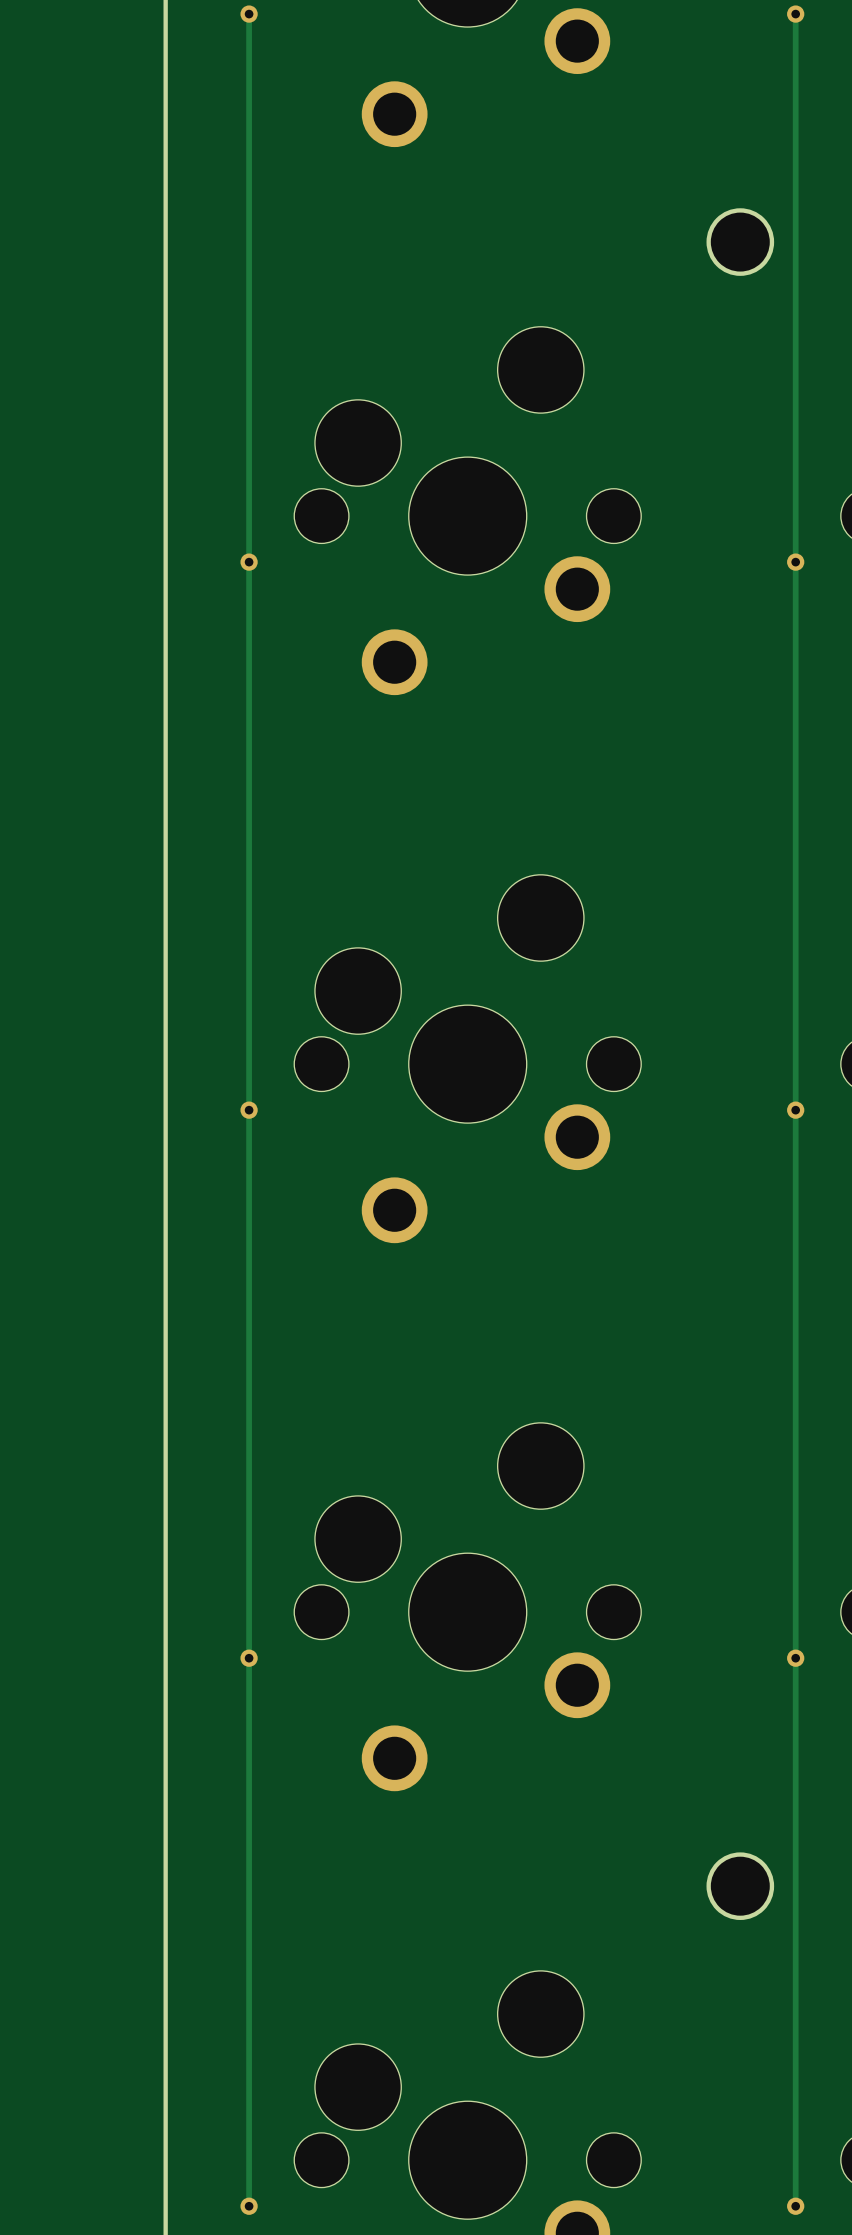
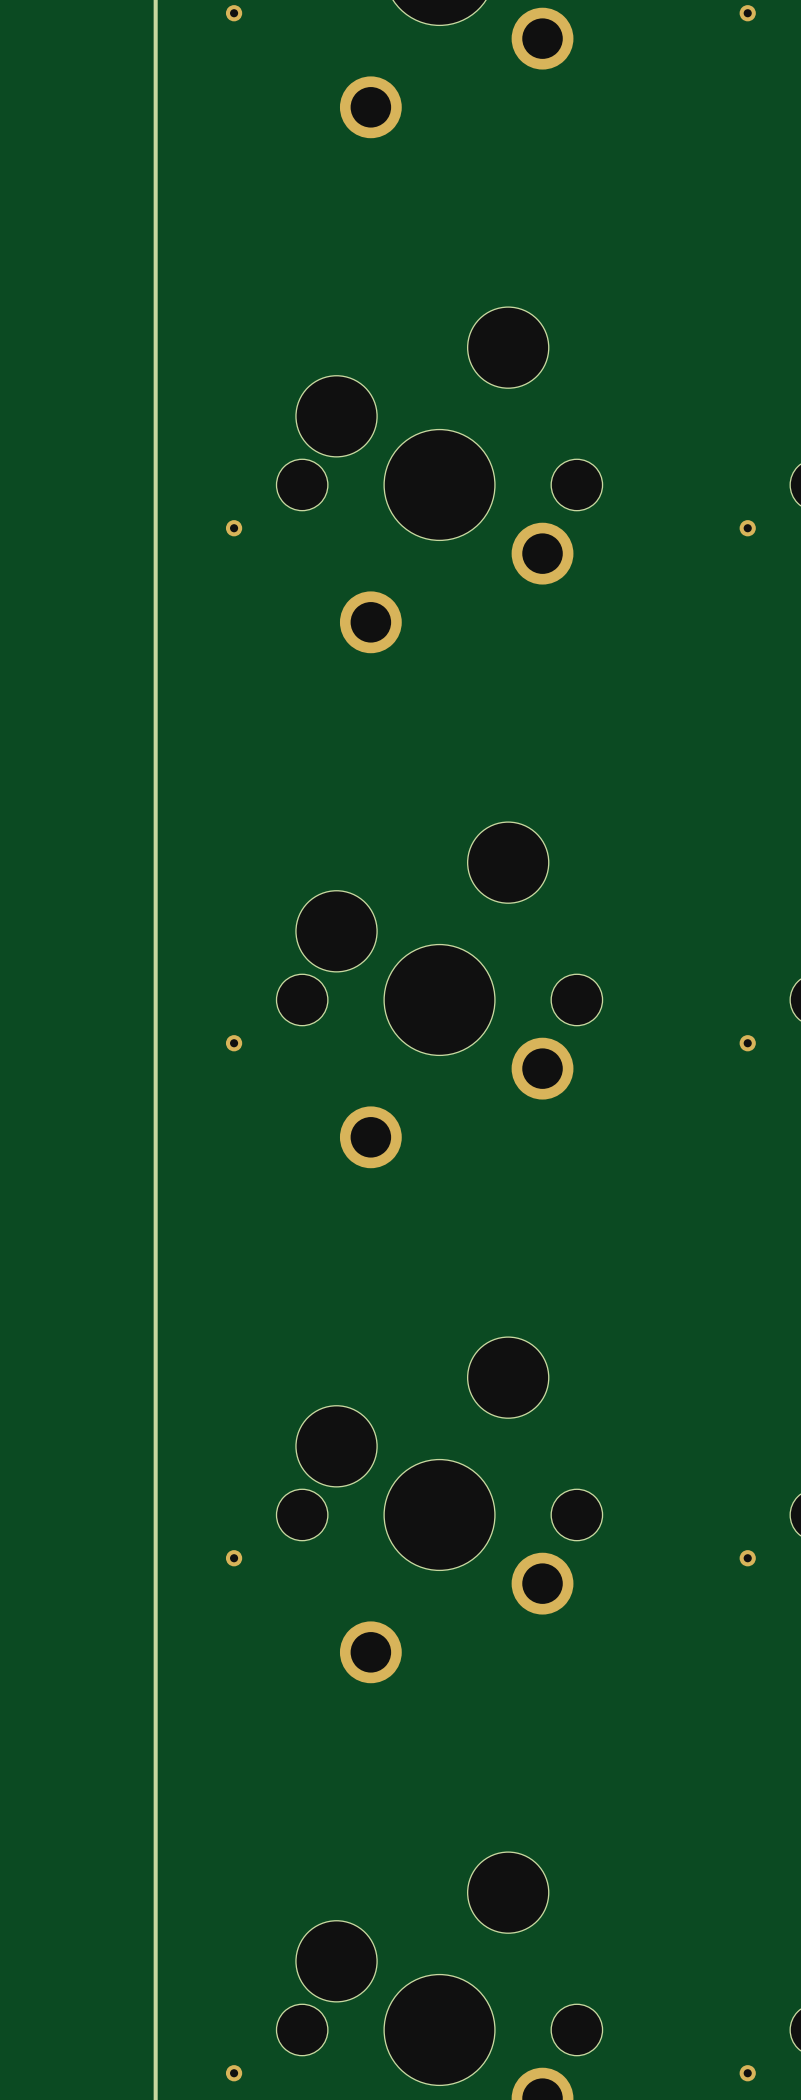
track: (249, 14) (249, 2206) -> none
track: (795, 14) (795, 2206) -> none
round board edge: [706, 208, 775, 276] -> none
part: (740, 242) -> none
round board edge: [706, 1852, 775, 1920] -> none
part: (740, 1886) -> none

